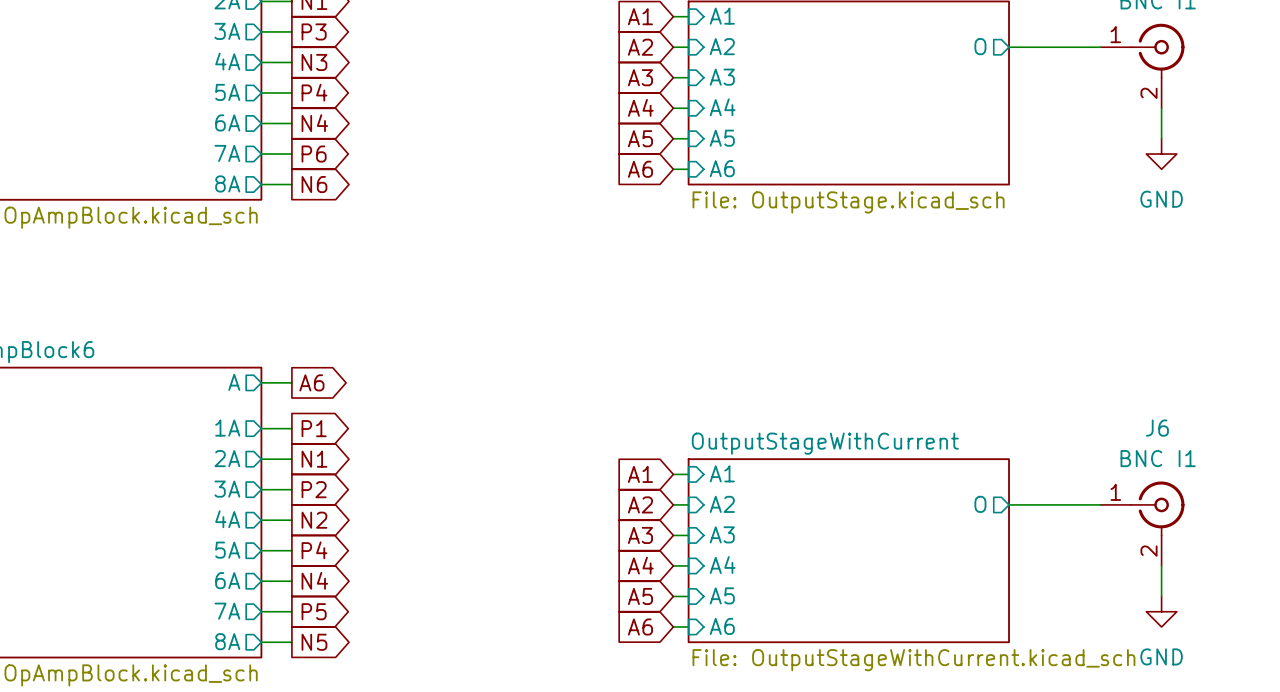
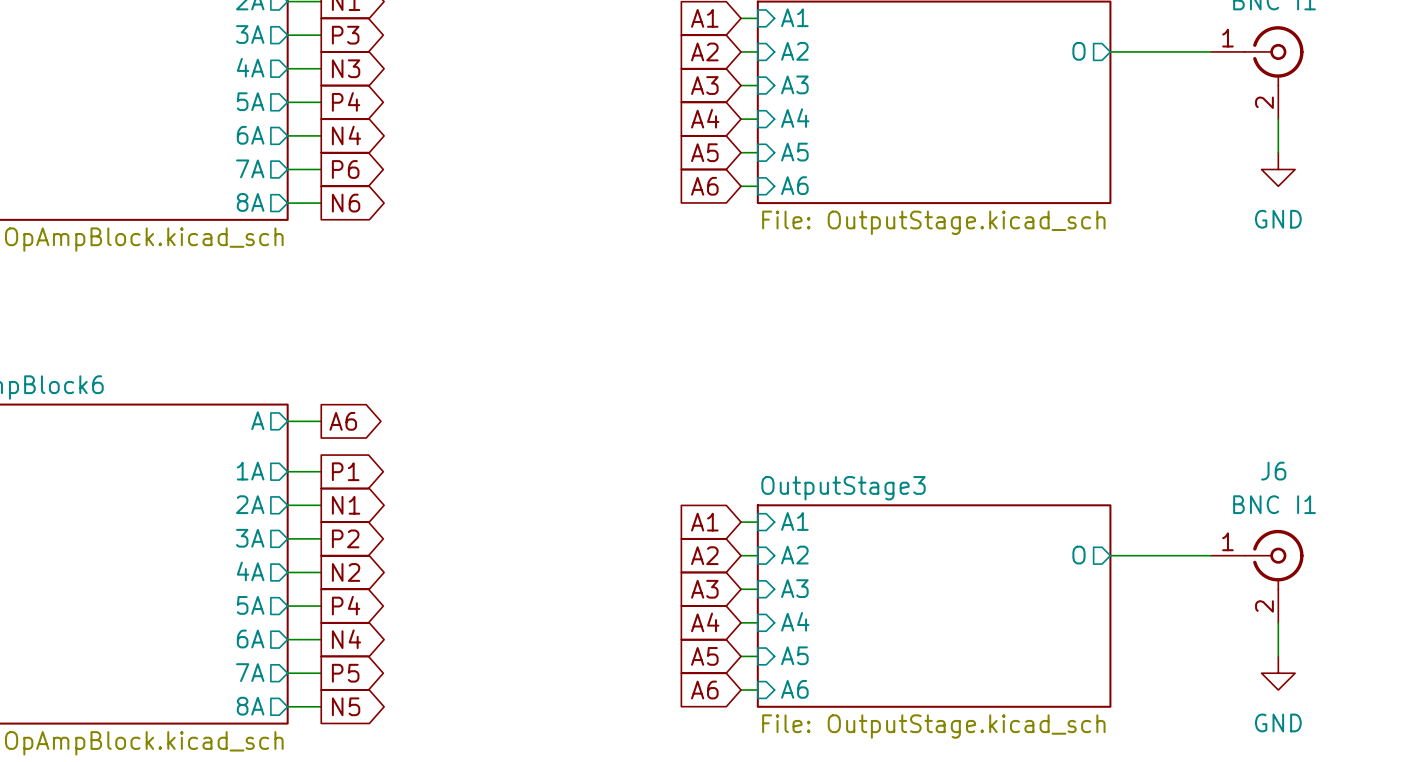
sheet OutputStageWithCurrent name: OutputStageWithCurrent (825, 443) -> OutputStage3 (843, 488)
sheet OutputStageWithCurrent value: File: OutputStageWithCurrent.kicad_sch (913, 660) -> File: OutputStage.kicad_sch (933, 726)

